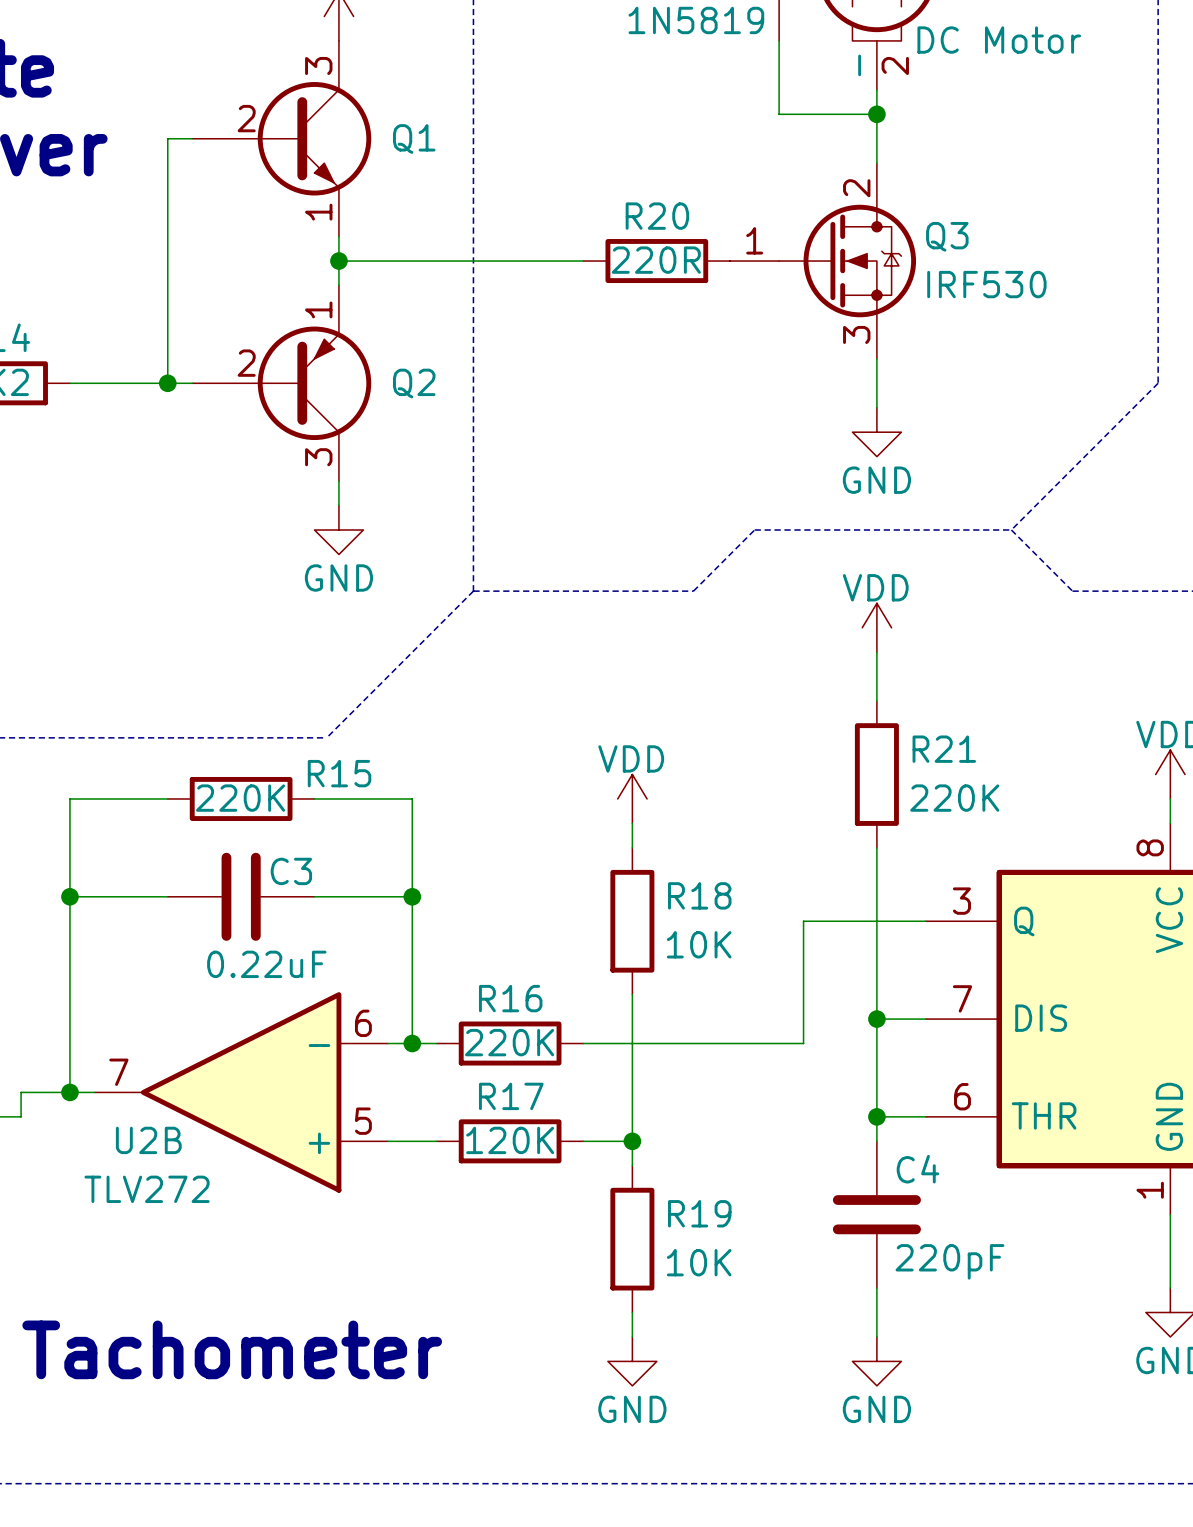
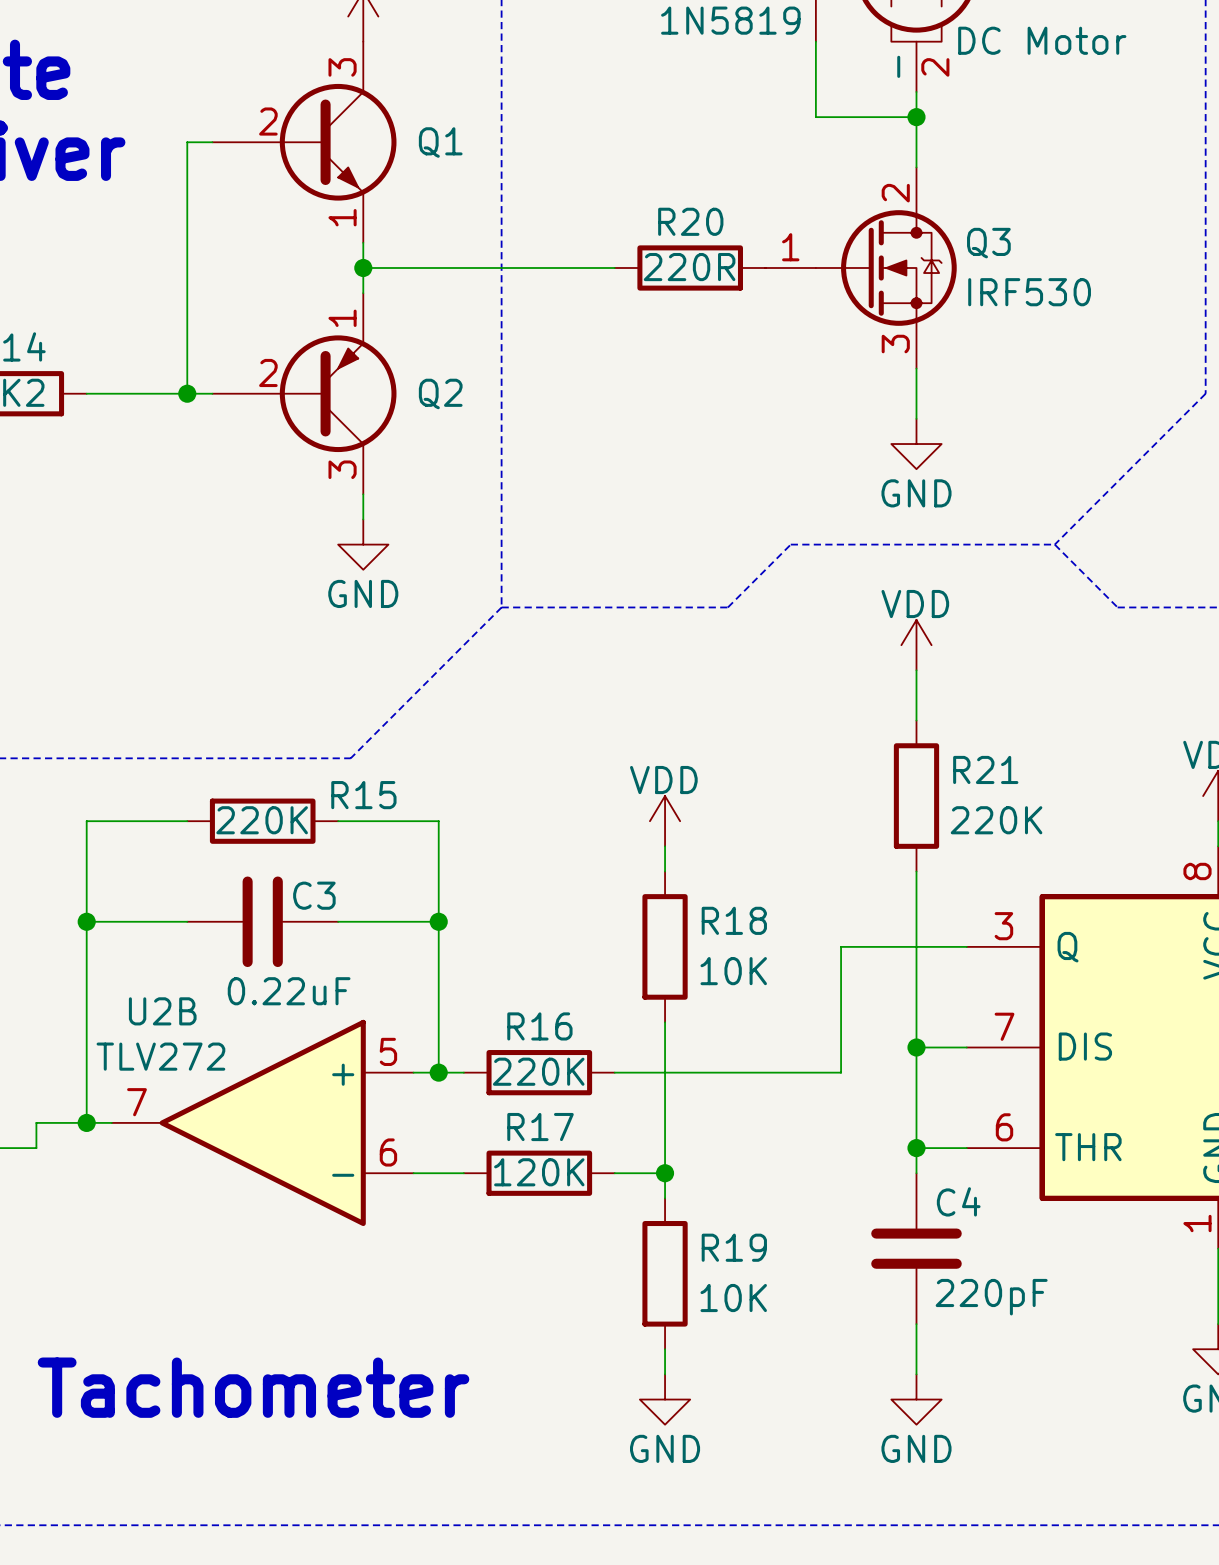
U2B flip: as is (241, 1092) -> up-down (262, 1122)
U2B name position: U2B (148, 1140) -> U2B (162, 1011)

